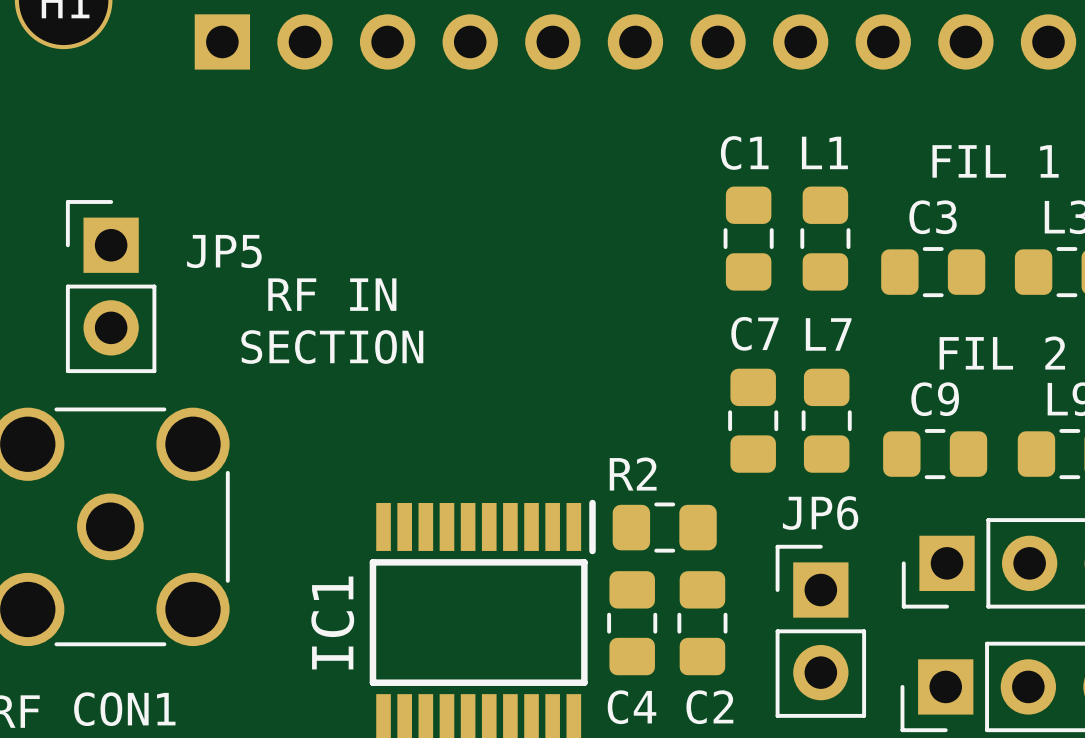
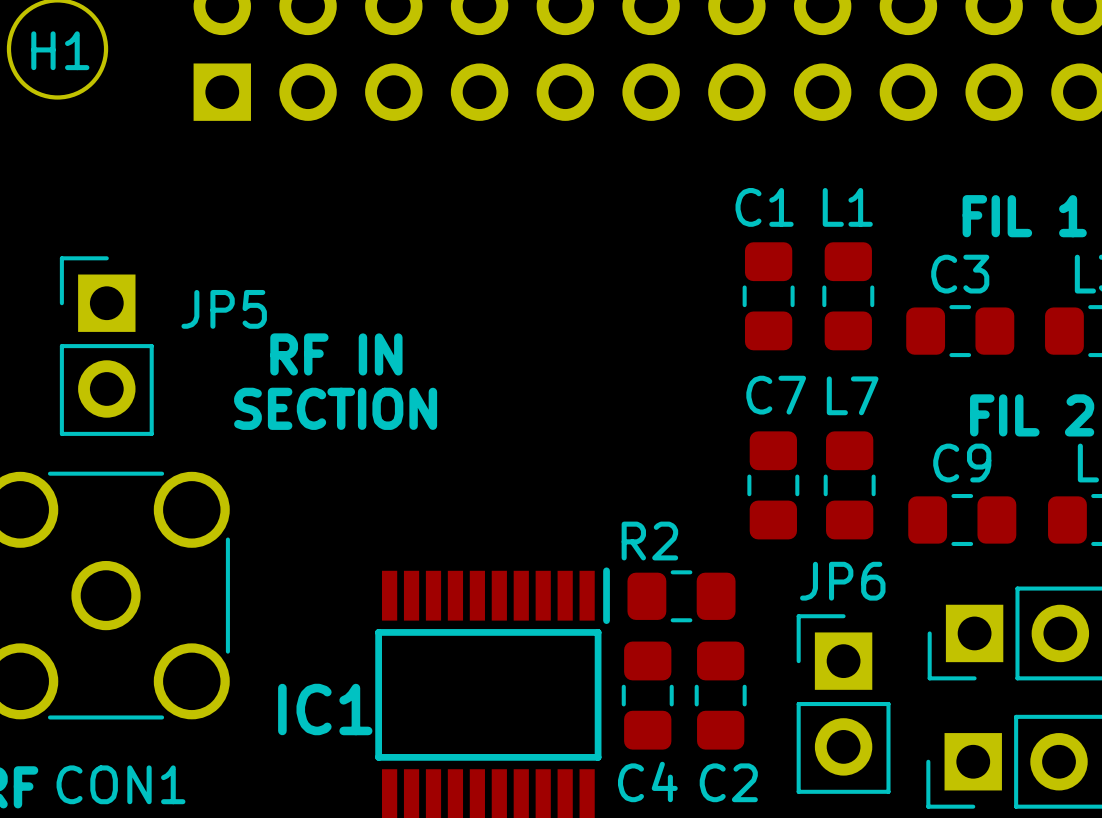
IC1 name rotation: 0° (332, 622) -> 90° clockwise (325, 709)

